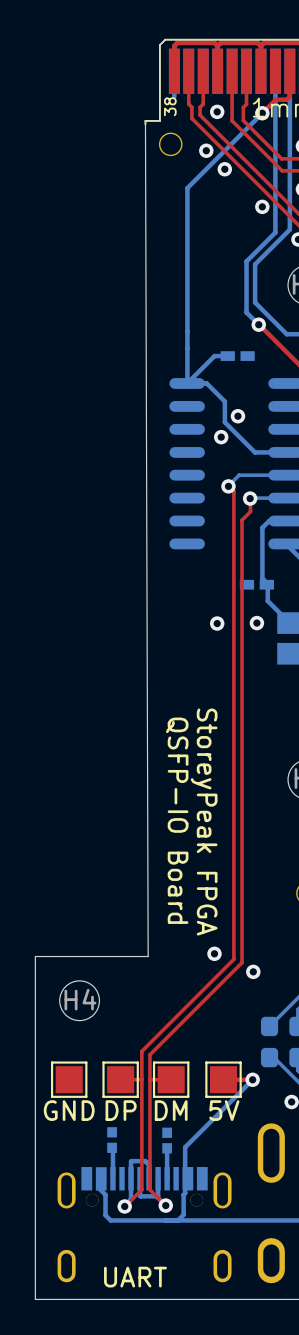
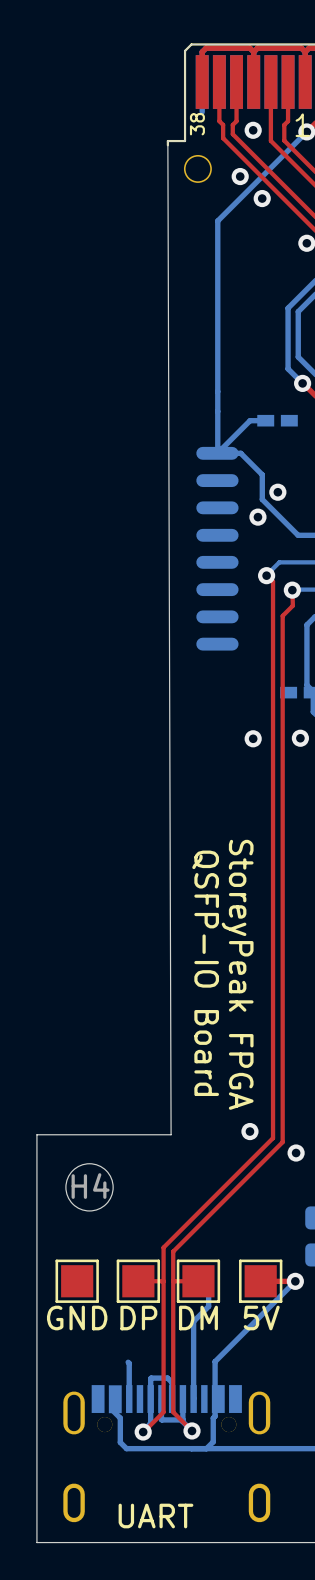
bottom track: none -> (208, 1295) (208, 1306) (193, 1321) (193, 1362)
part: (112, 1140) -> none
part: (167, 1140) -> none

